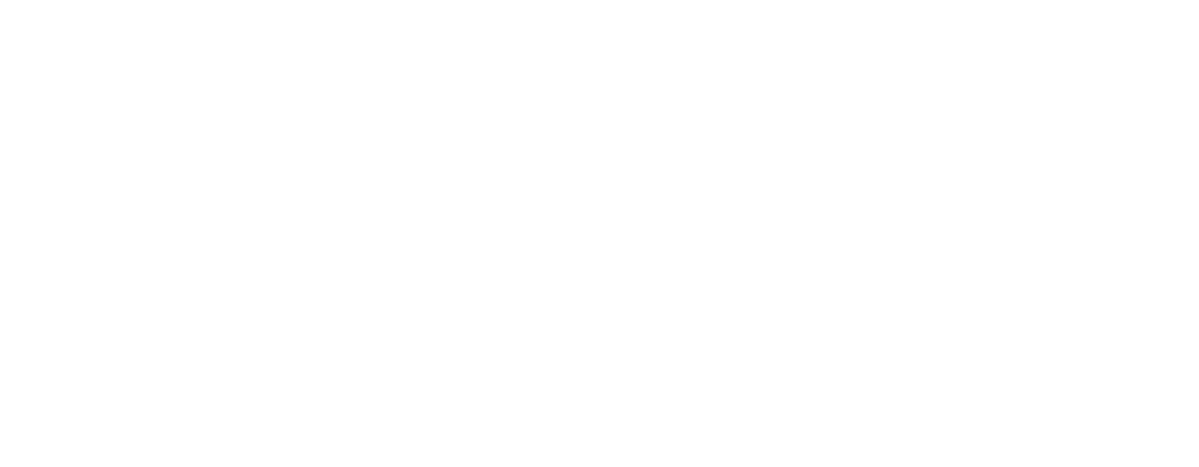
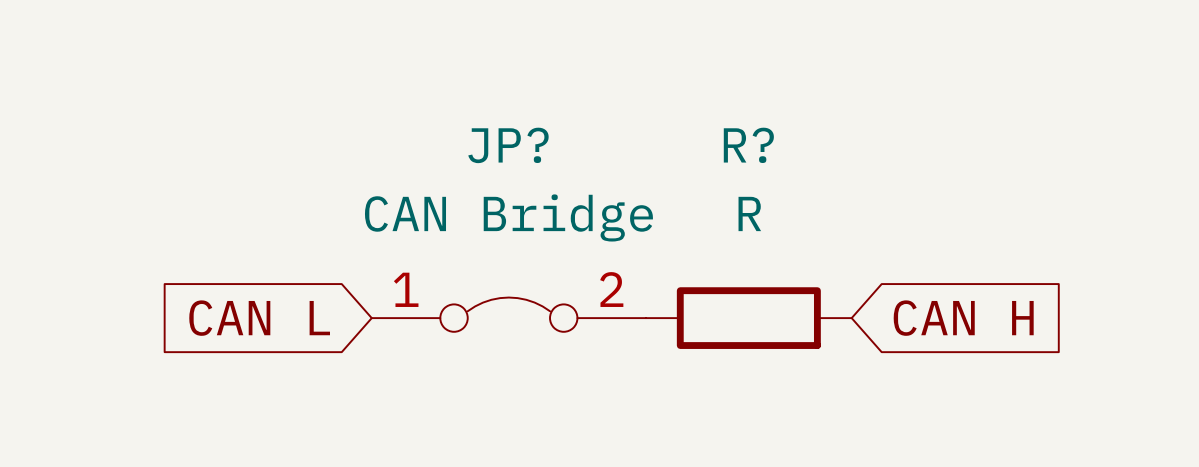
JP?: none -> CAN Bridge (508, 314)
global label: none -> CAN L (259, 318)
R?: none -> R (748, 318)
global label: none -> CAN H (963, 318)

